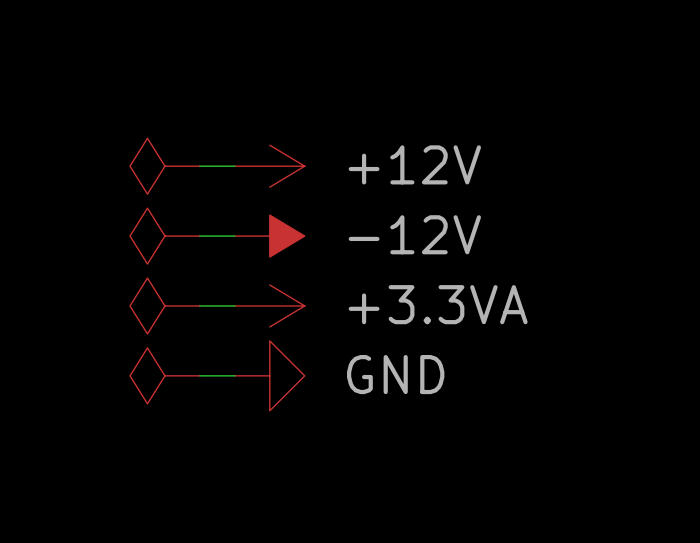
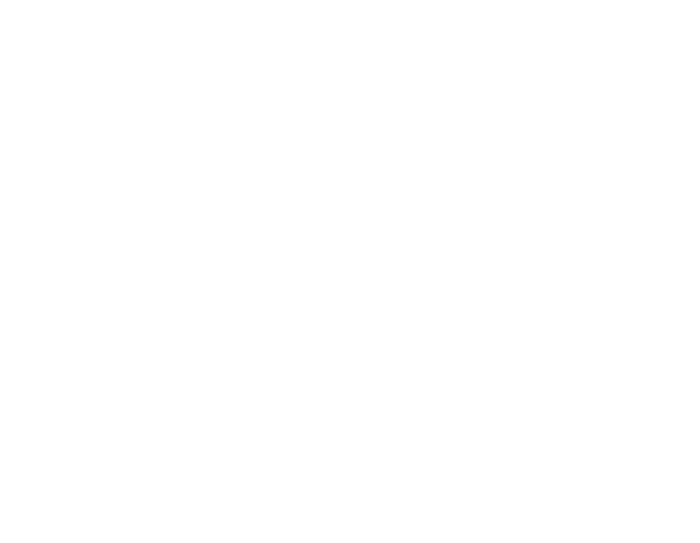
power symbol: (164, 166) -> none
wire: (199, 166) (234, 166) -> none
power symbol: +12V (269, 166) -> none
power symbol: (164, 236) -> none
wire: (199, 236) (234, 236) -> none
power symbol: -12V (269, 236) -> none
power symbol: (164, 305) -> none
wire: (199, 305) (234, 305) -> none
power symbol: +3.3VA (269, 305) -> none
power symbol: (164, 375) -> none
wire: (199, 375) (234, 375) -> none
power symbol: GND (269, 375) -> none

